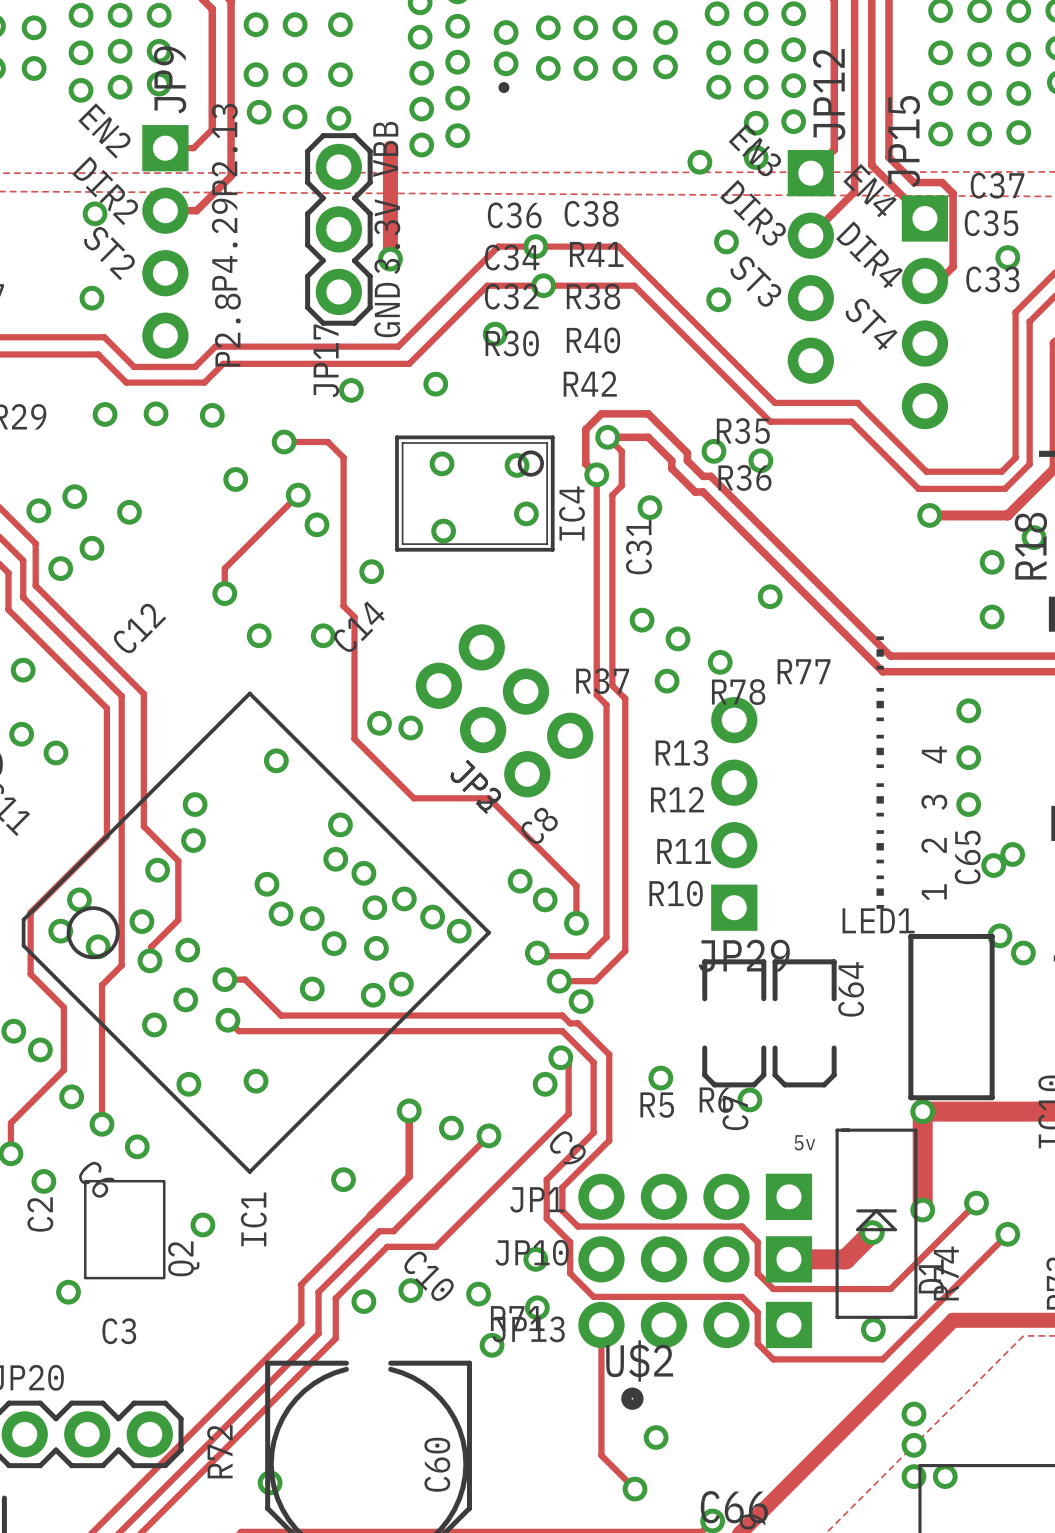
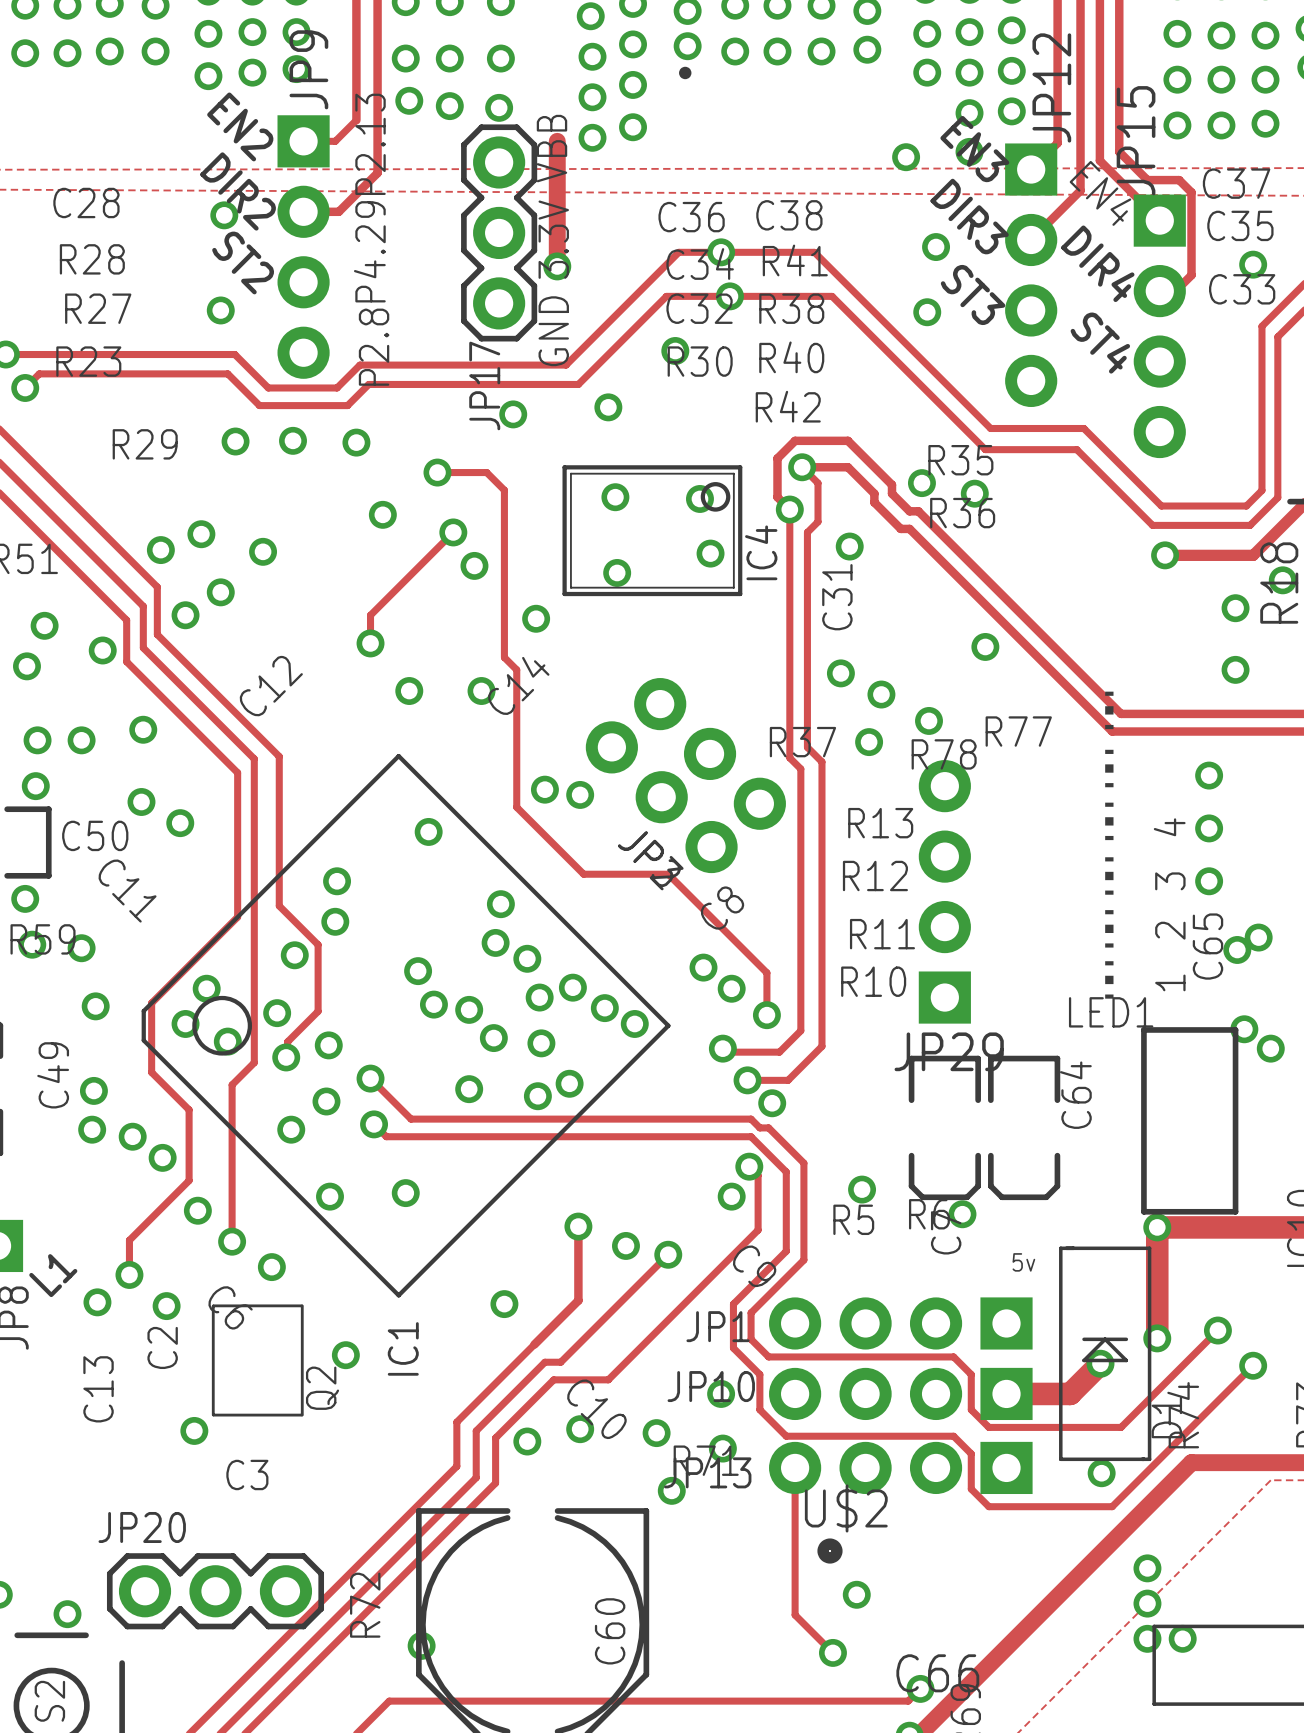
track: (224, 979) (245, 979) (281, 1015) -> (370, 1078) (411, 1119) (433, 1119)

